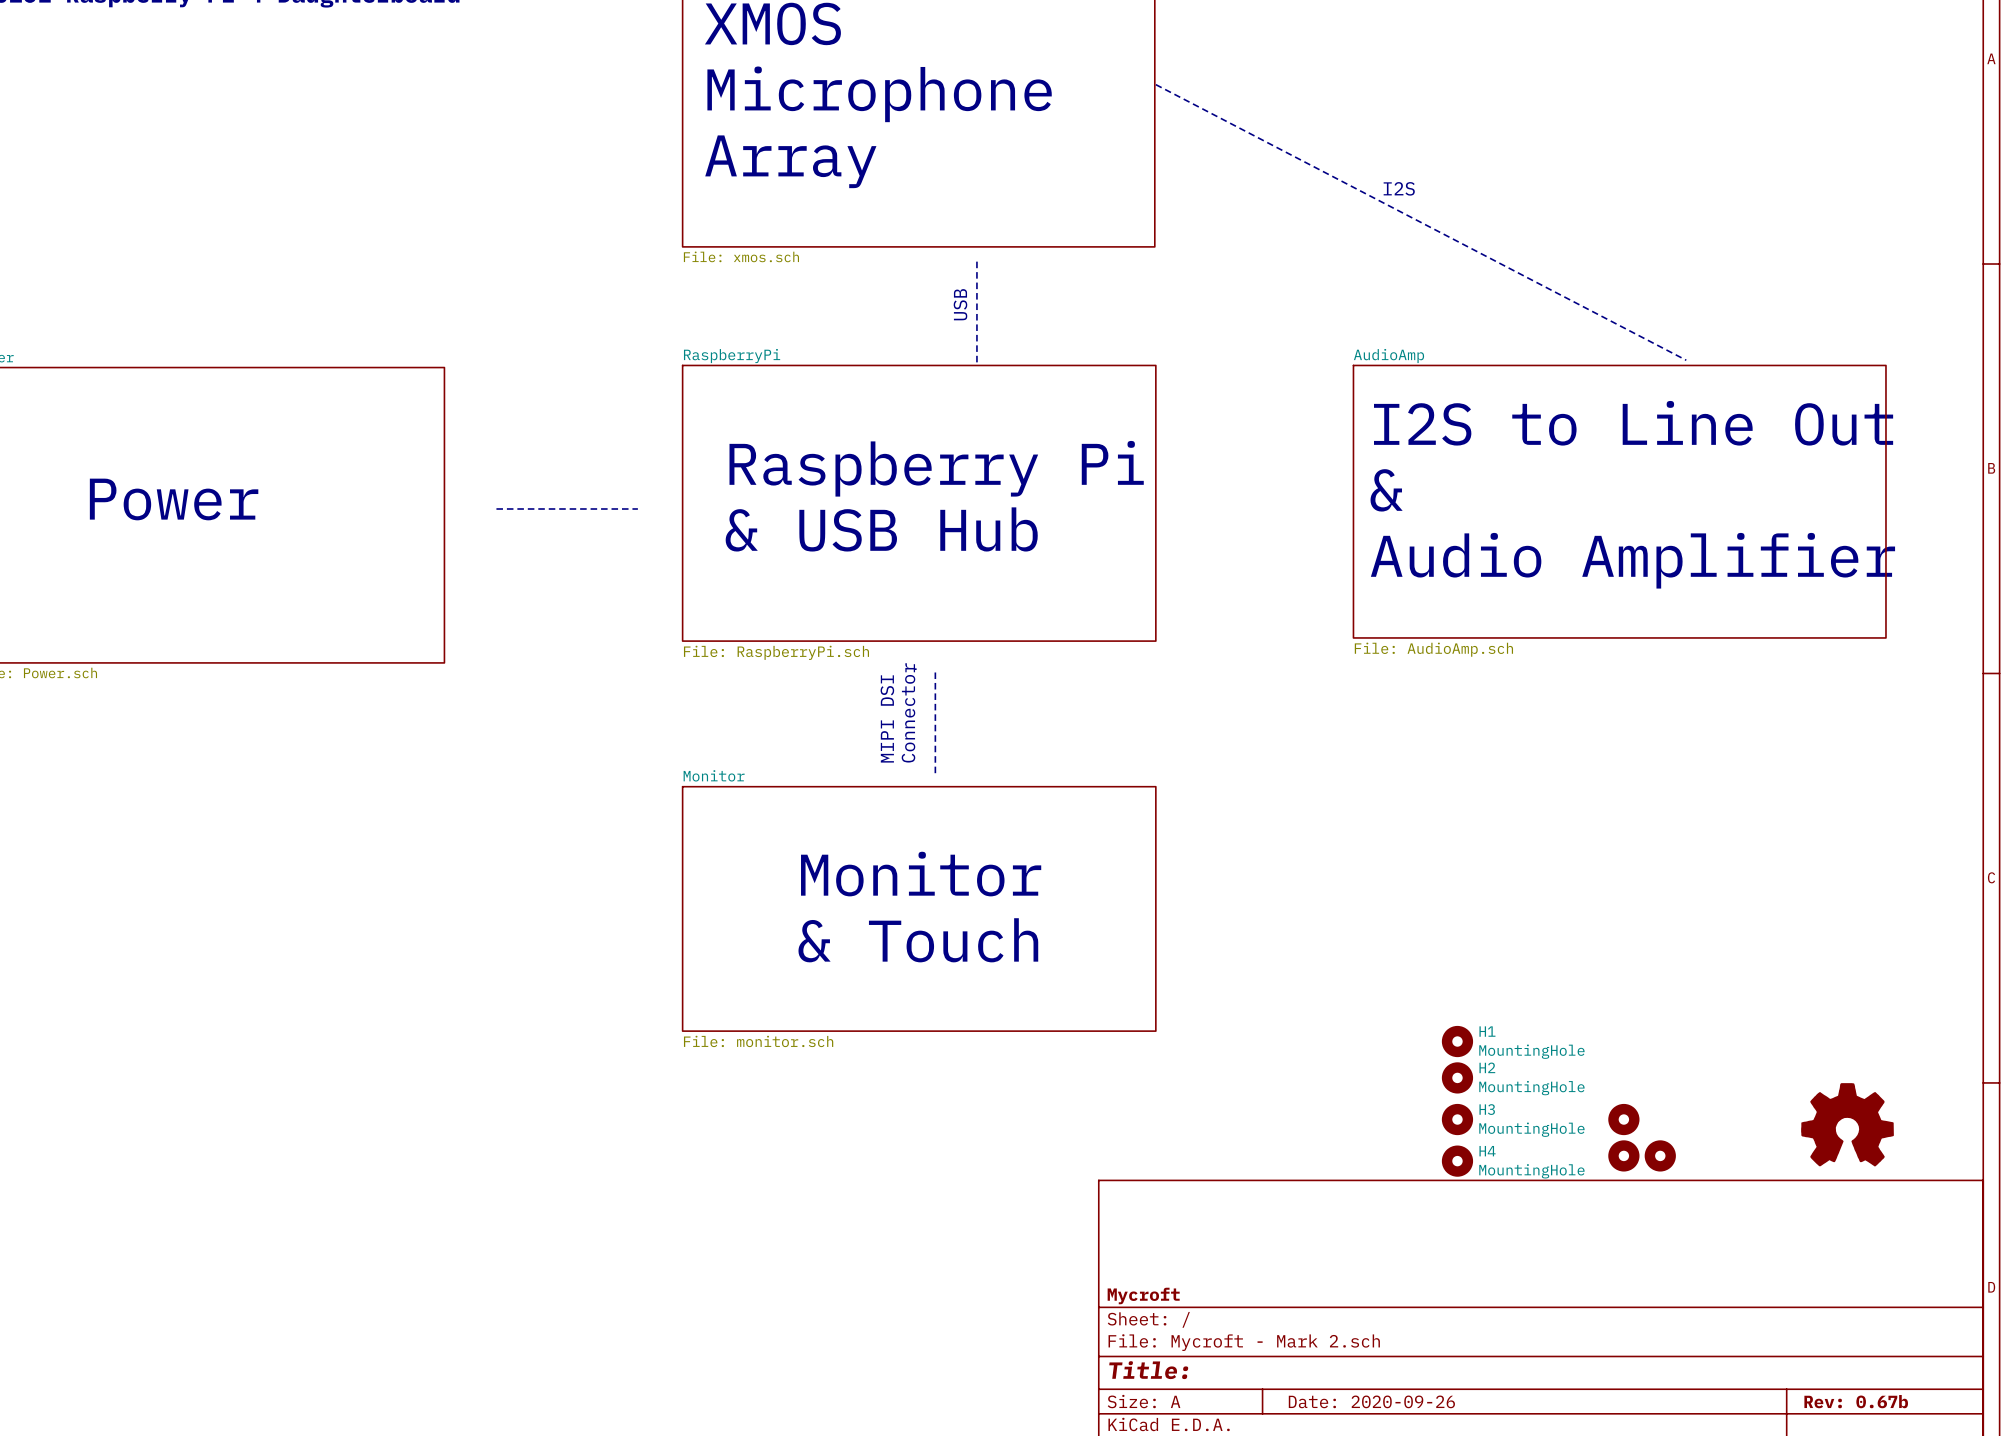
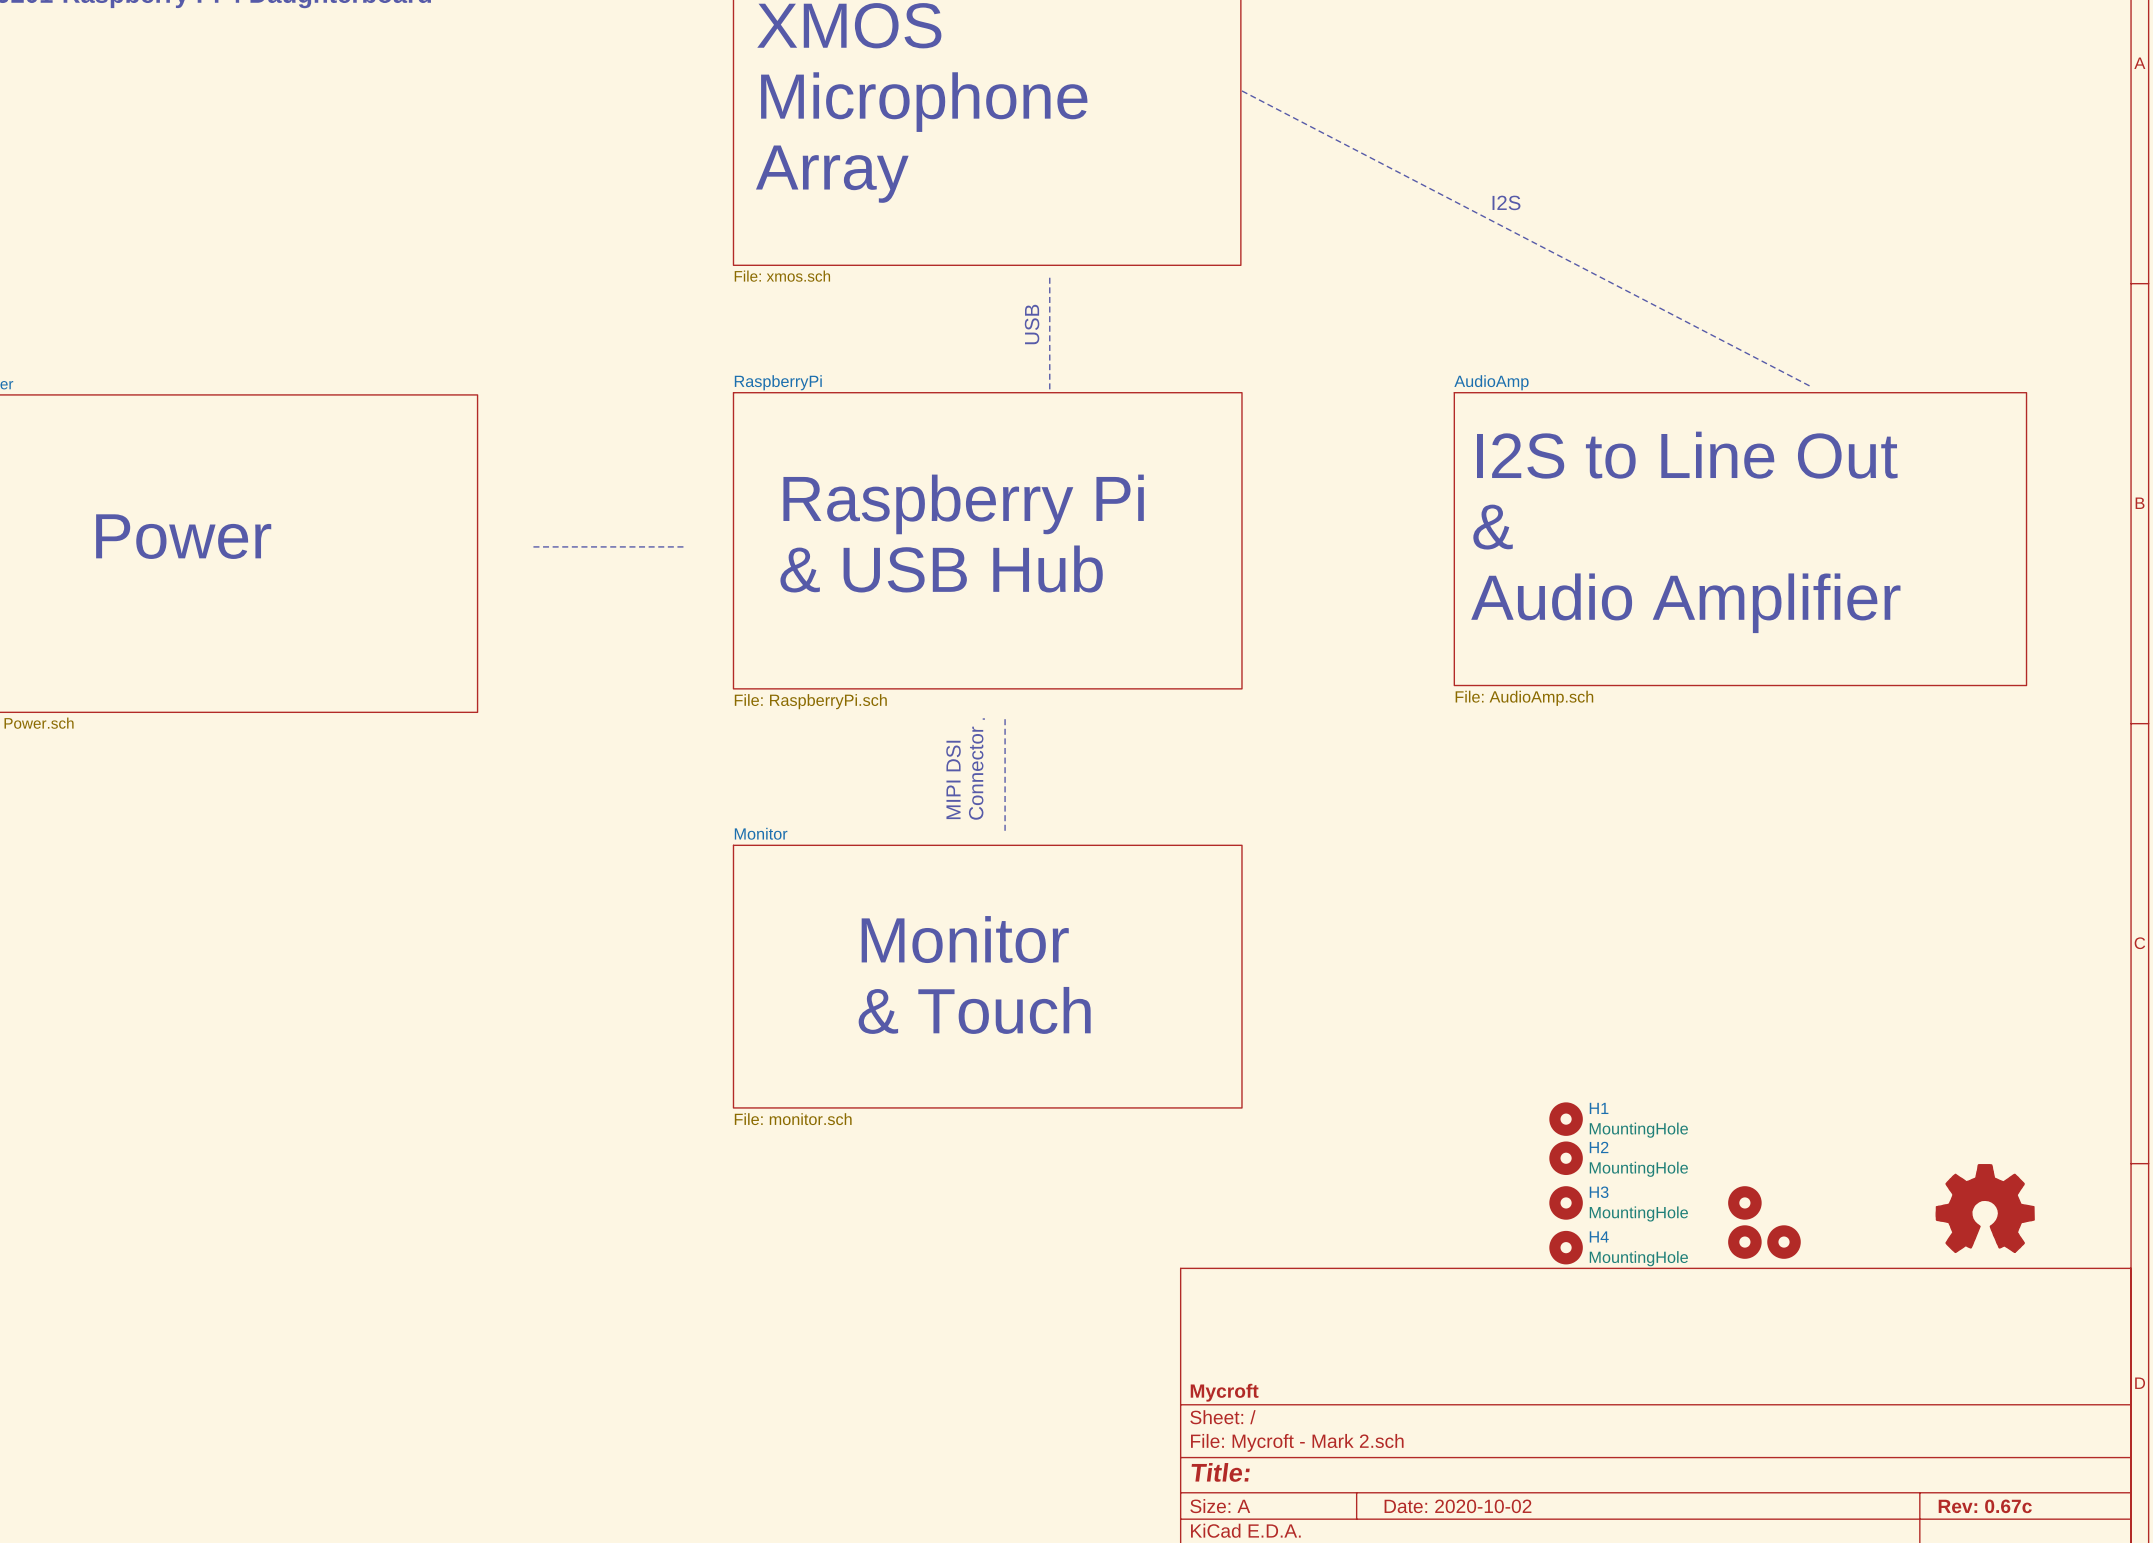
title block: Date: 2020-09-26 (1371, 1401) -> Date: 2020-10-02 (1458, 1506)
title block: Rev: 0.67b (1856, 1401) -> Rev: 0.67c (1985, 1506)

